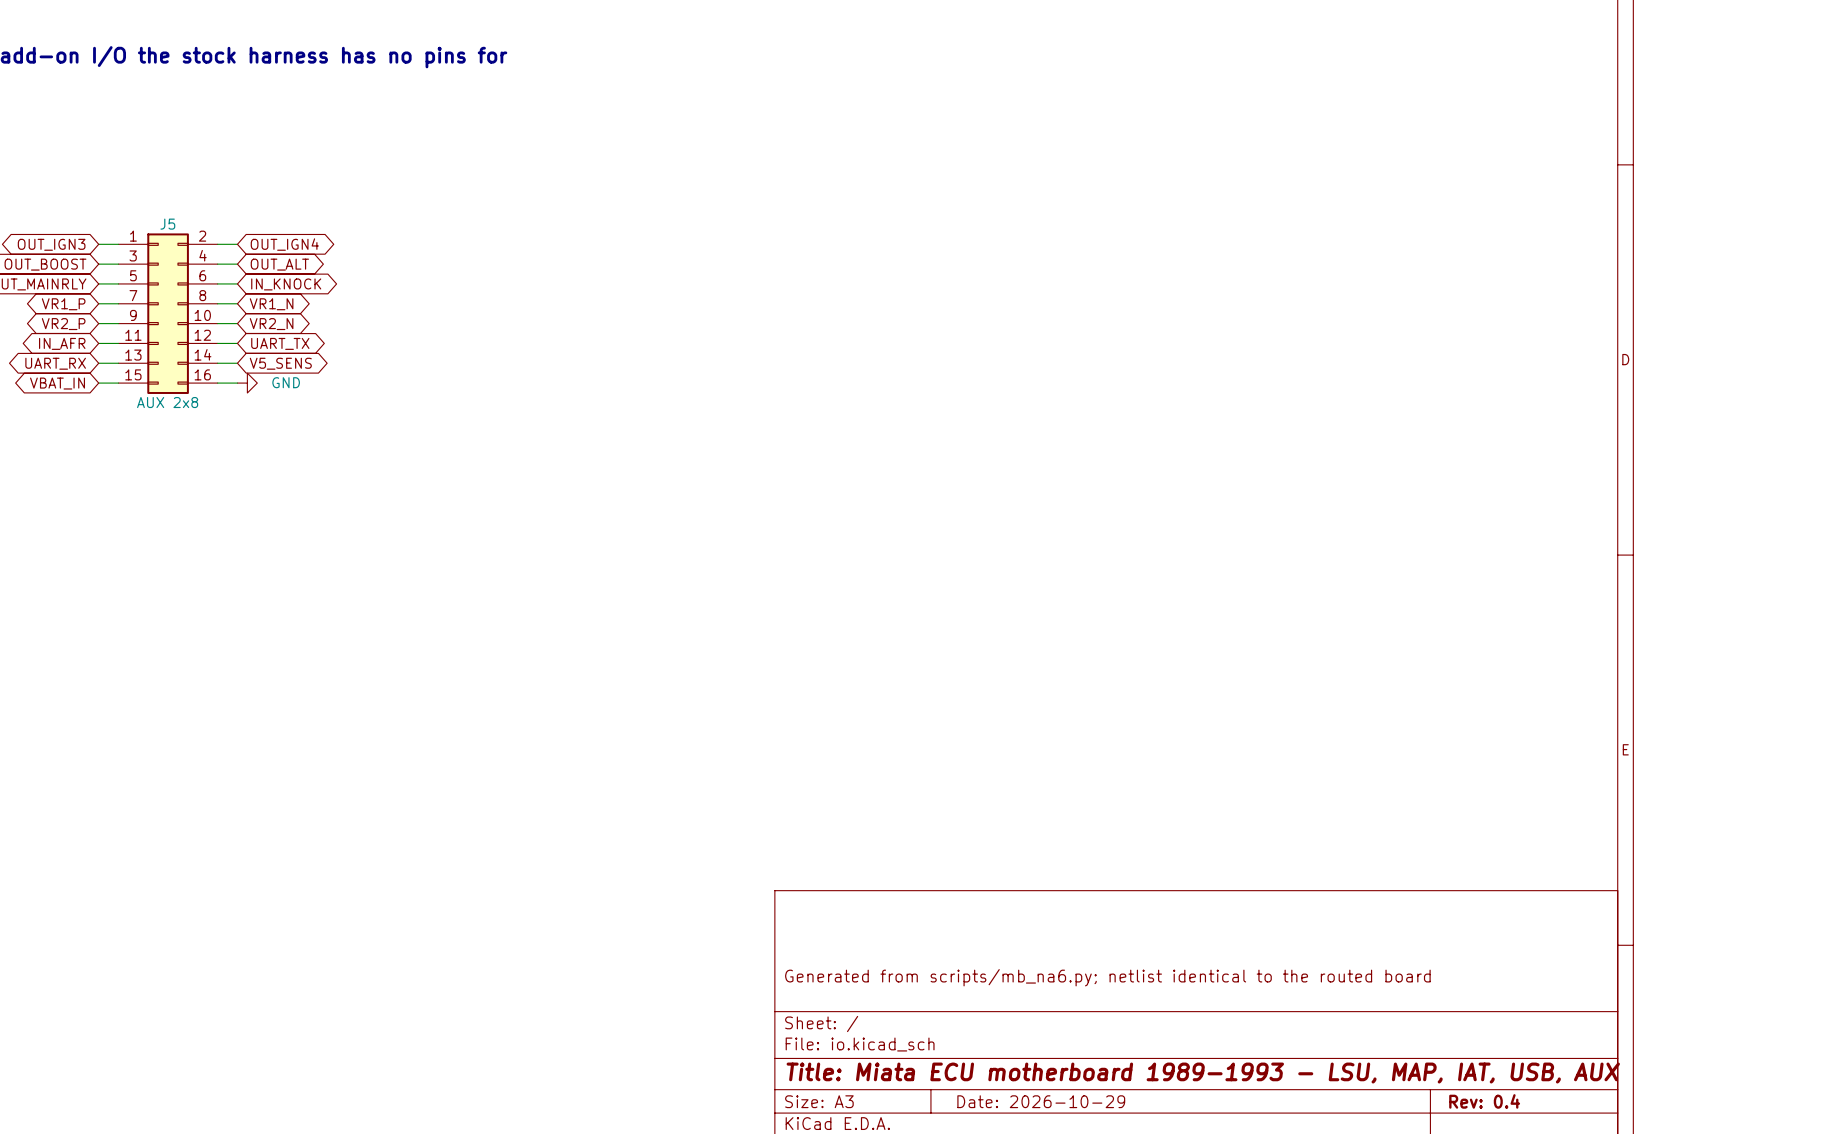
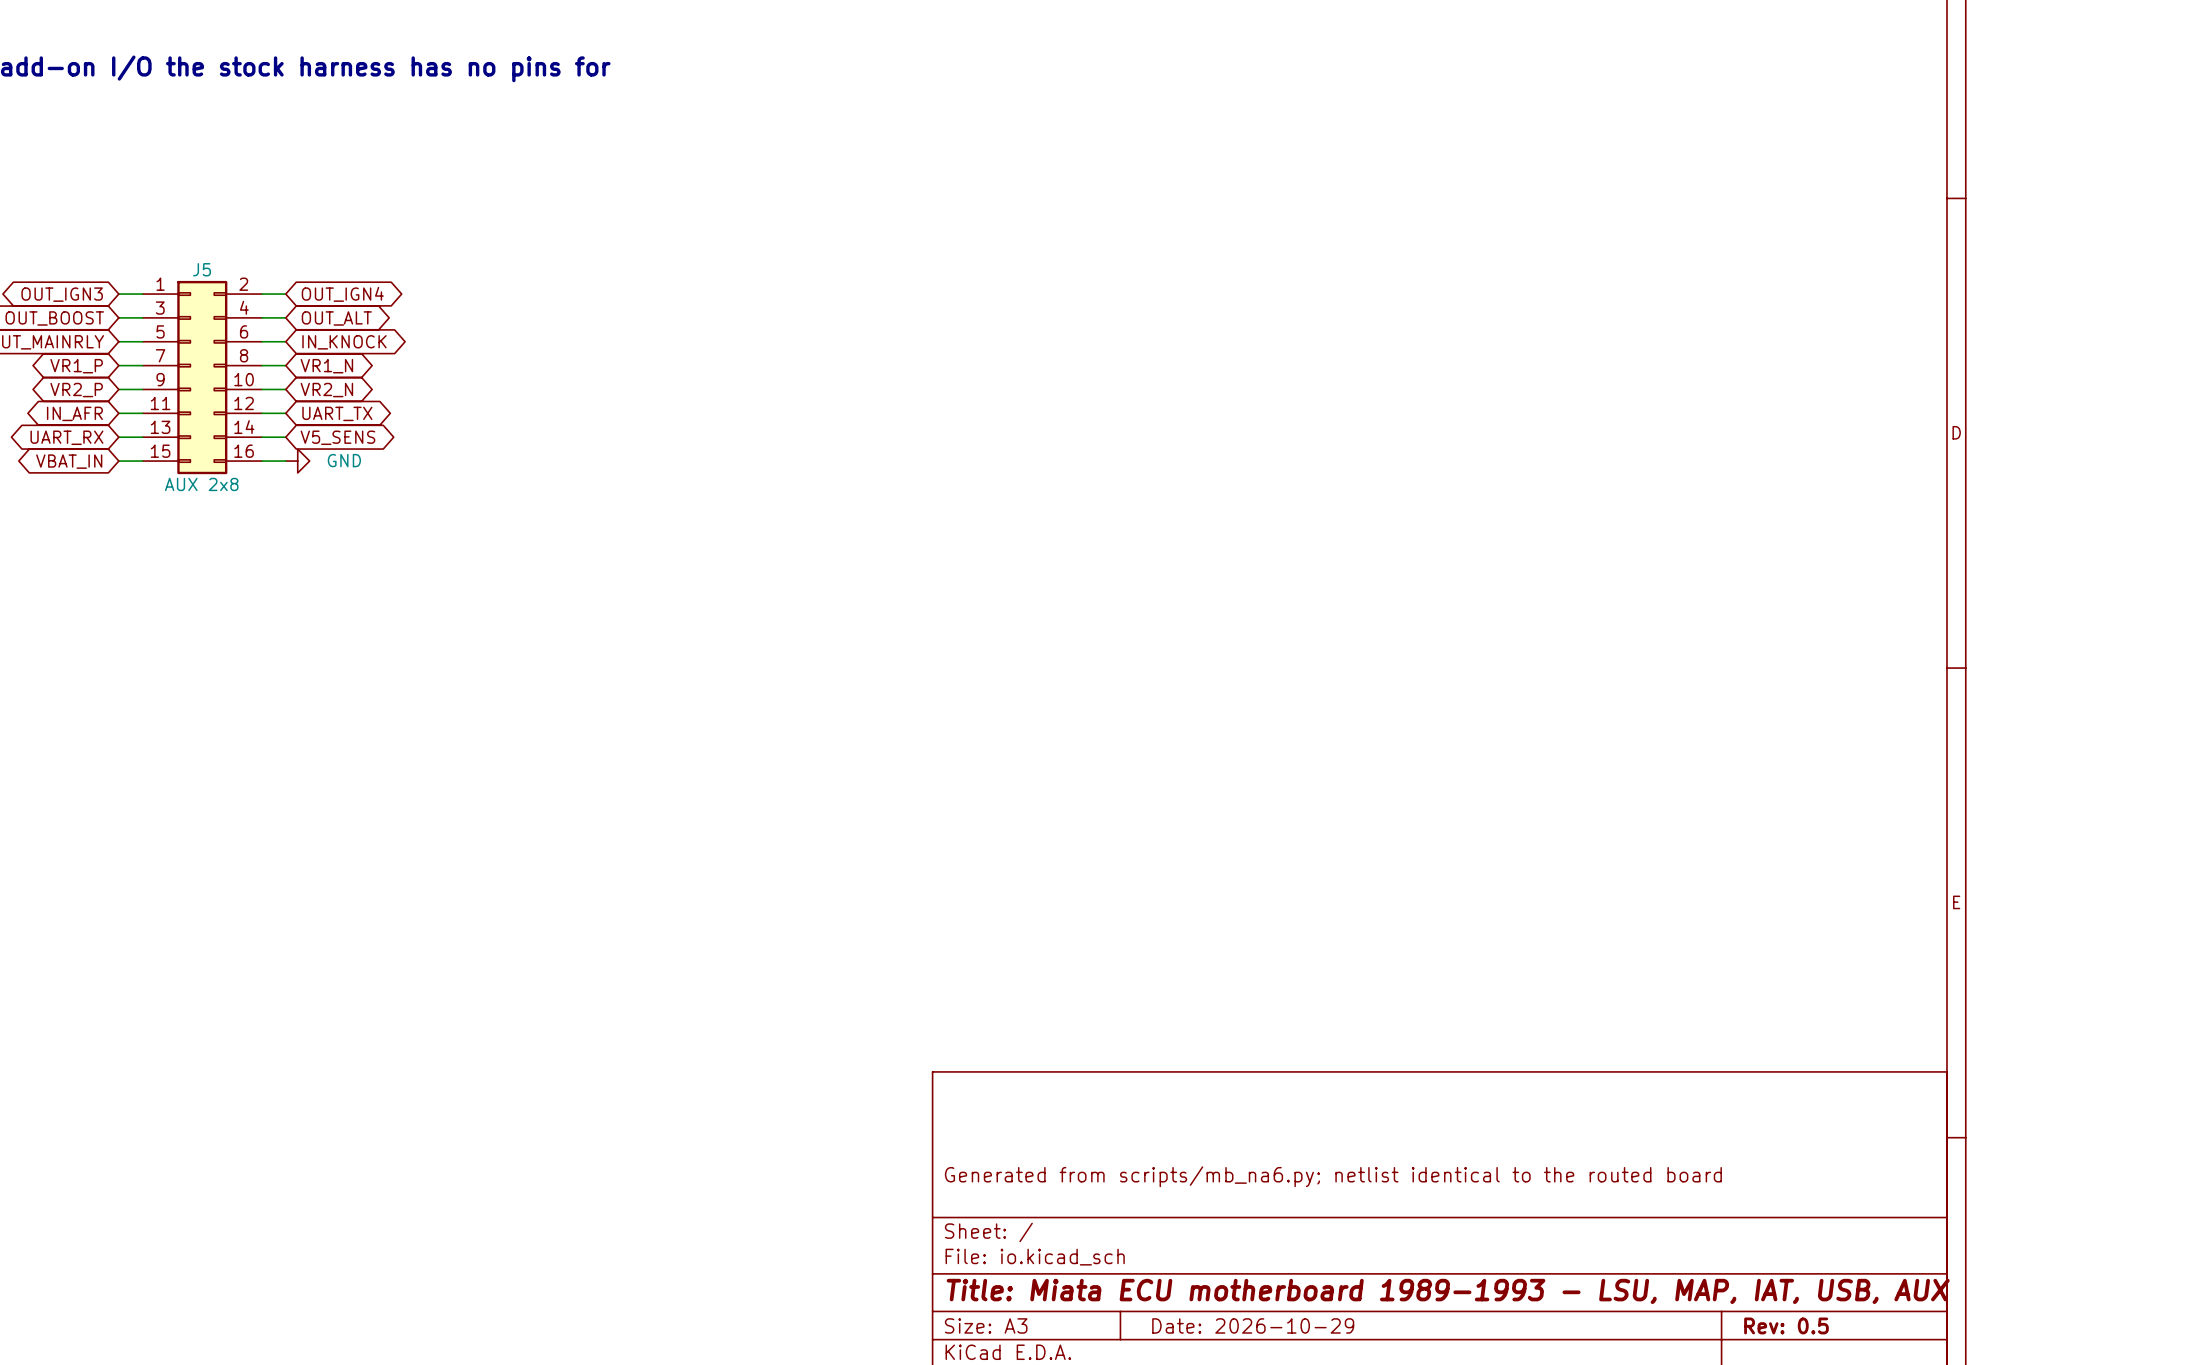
title block: Rev: 0.4 (1484, 1101) -> Rev: 0.5 (1786, 1325)

